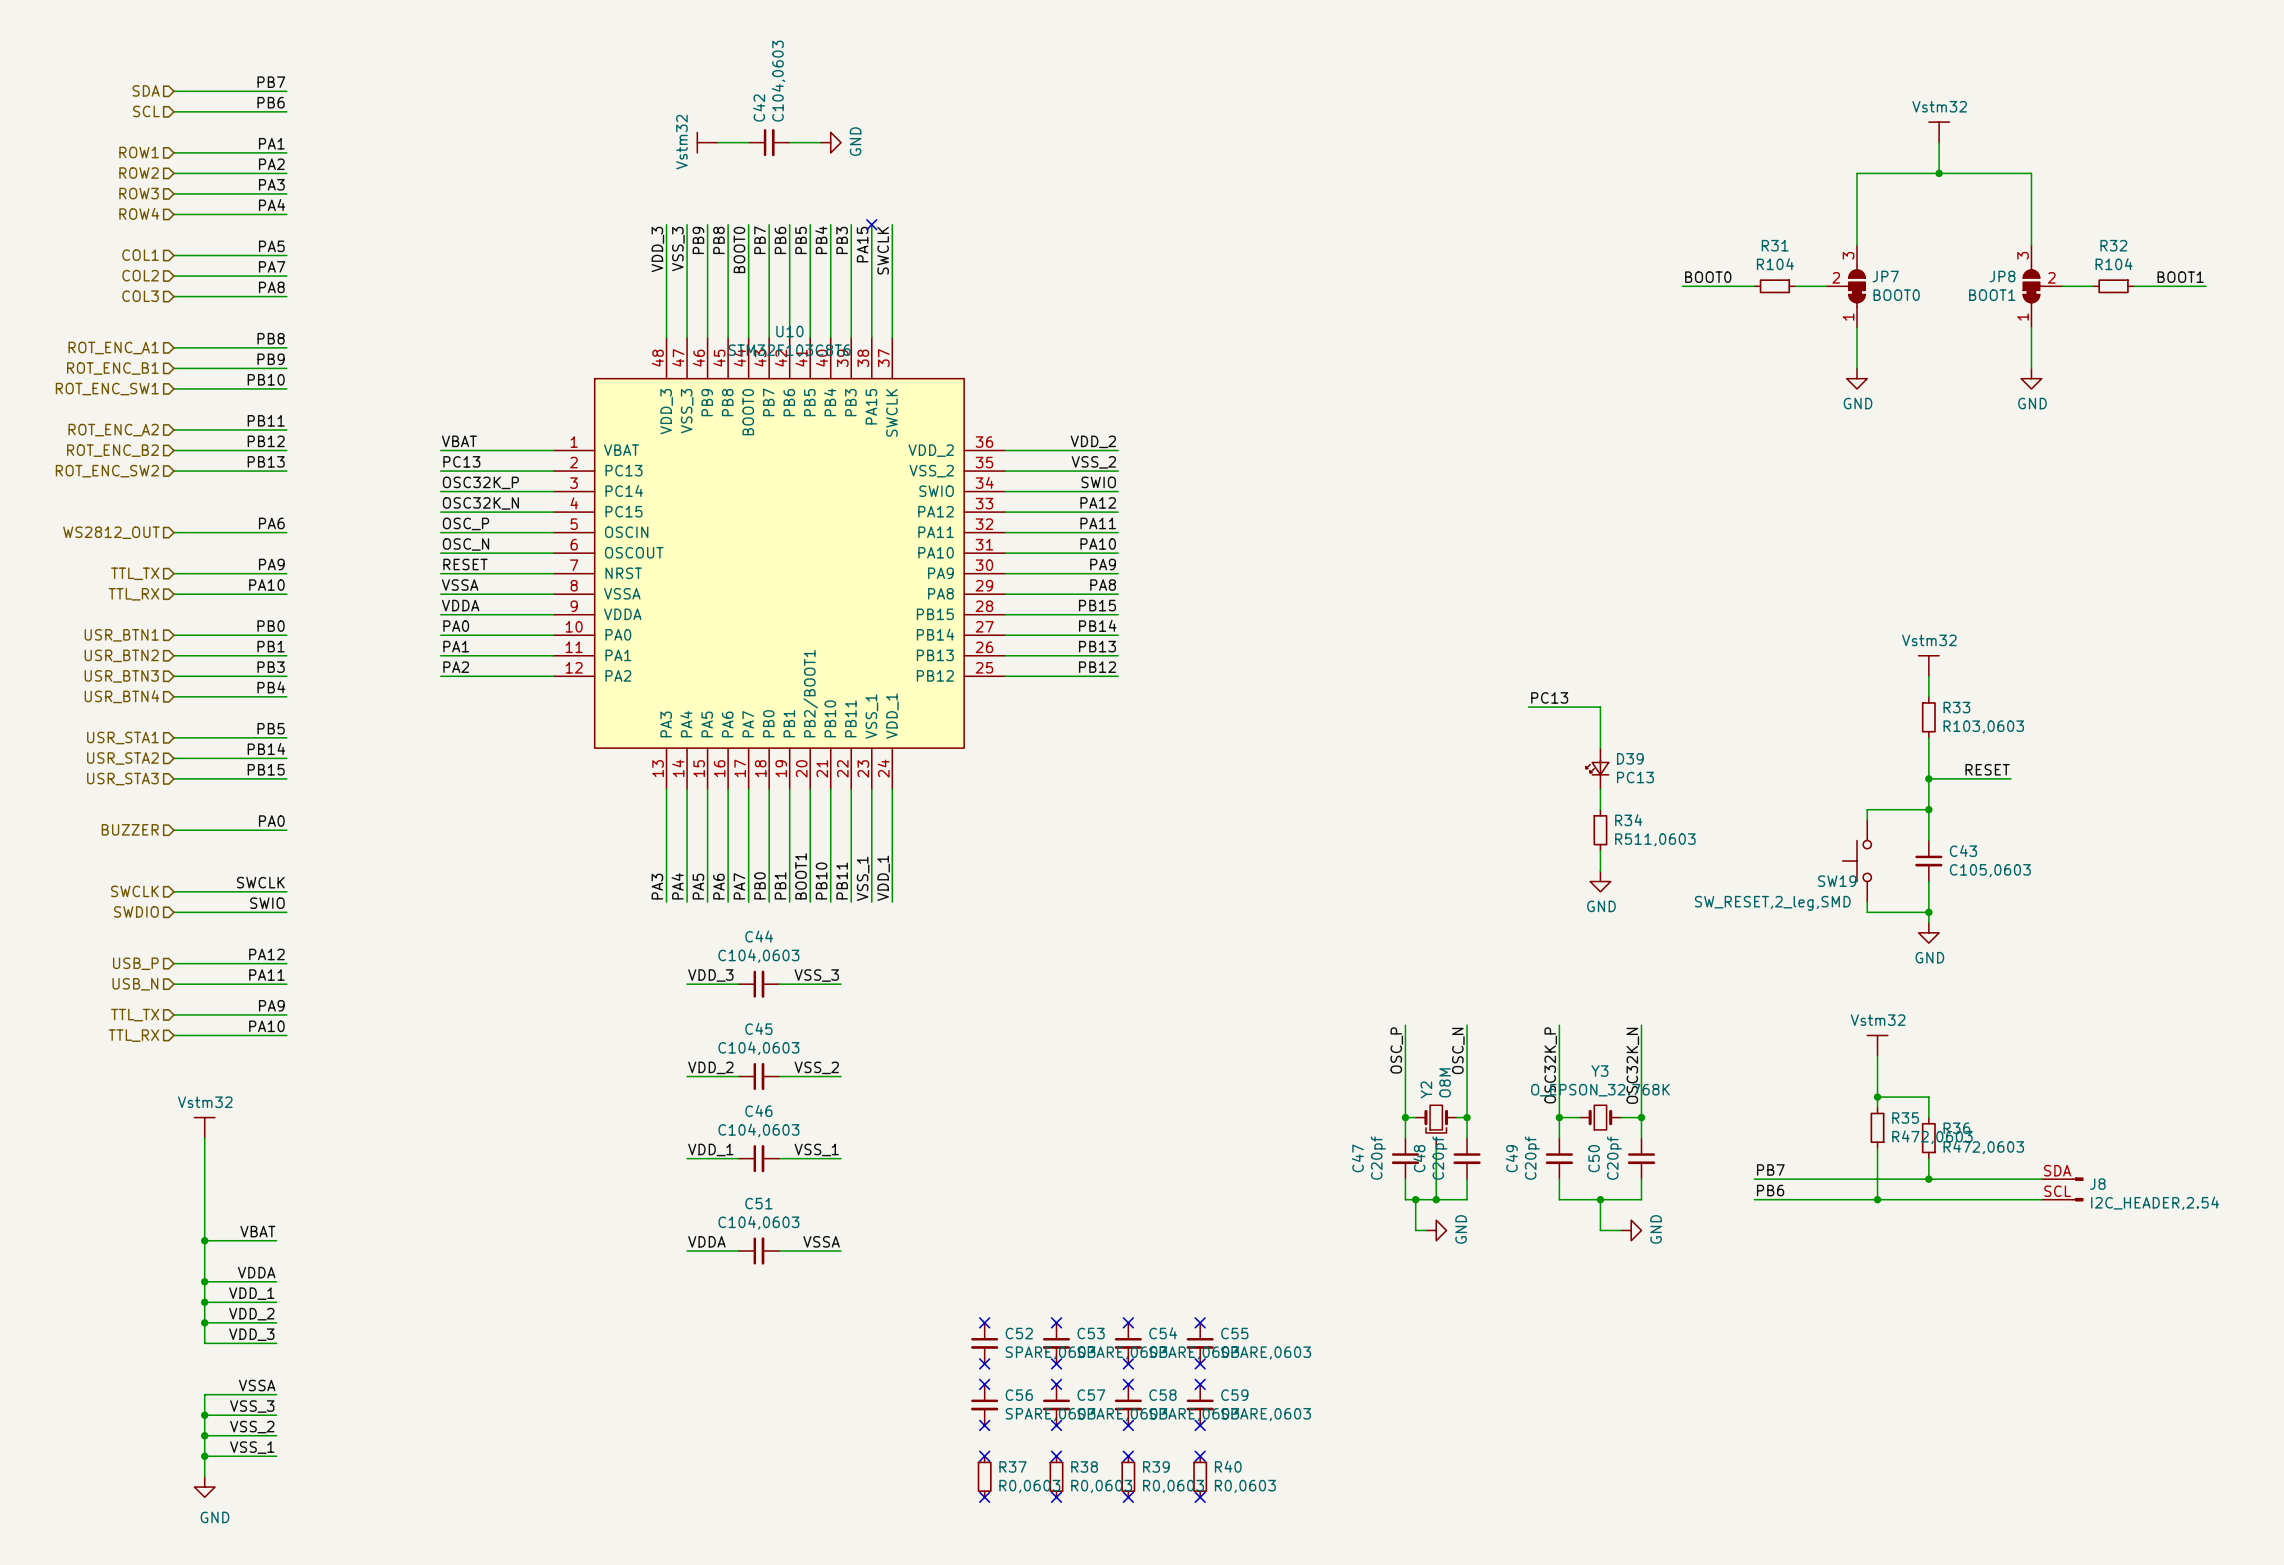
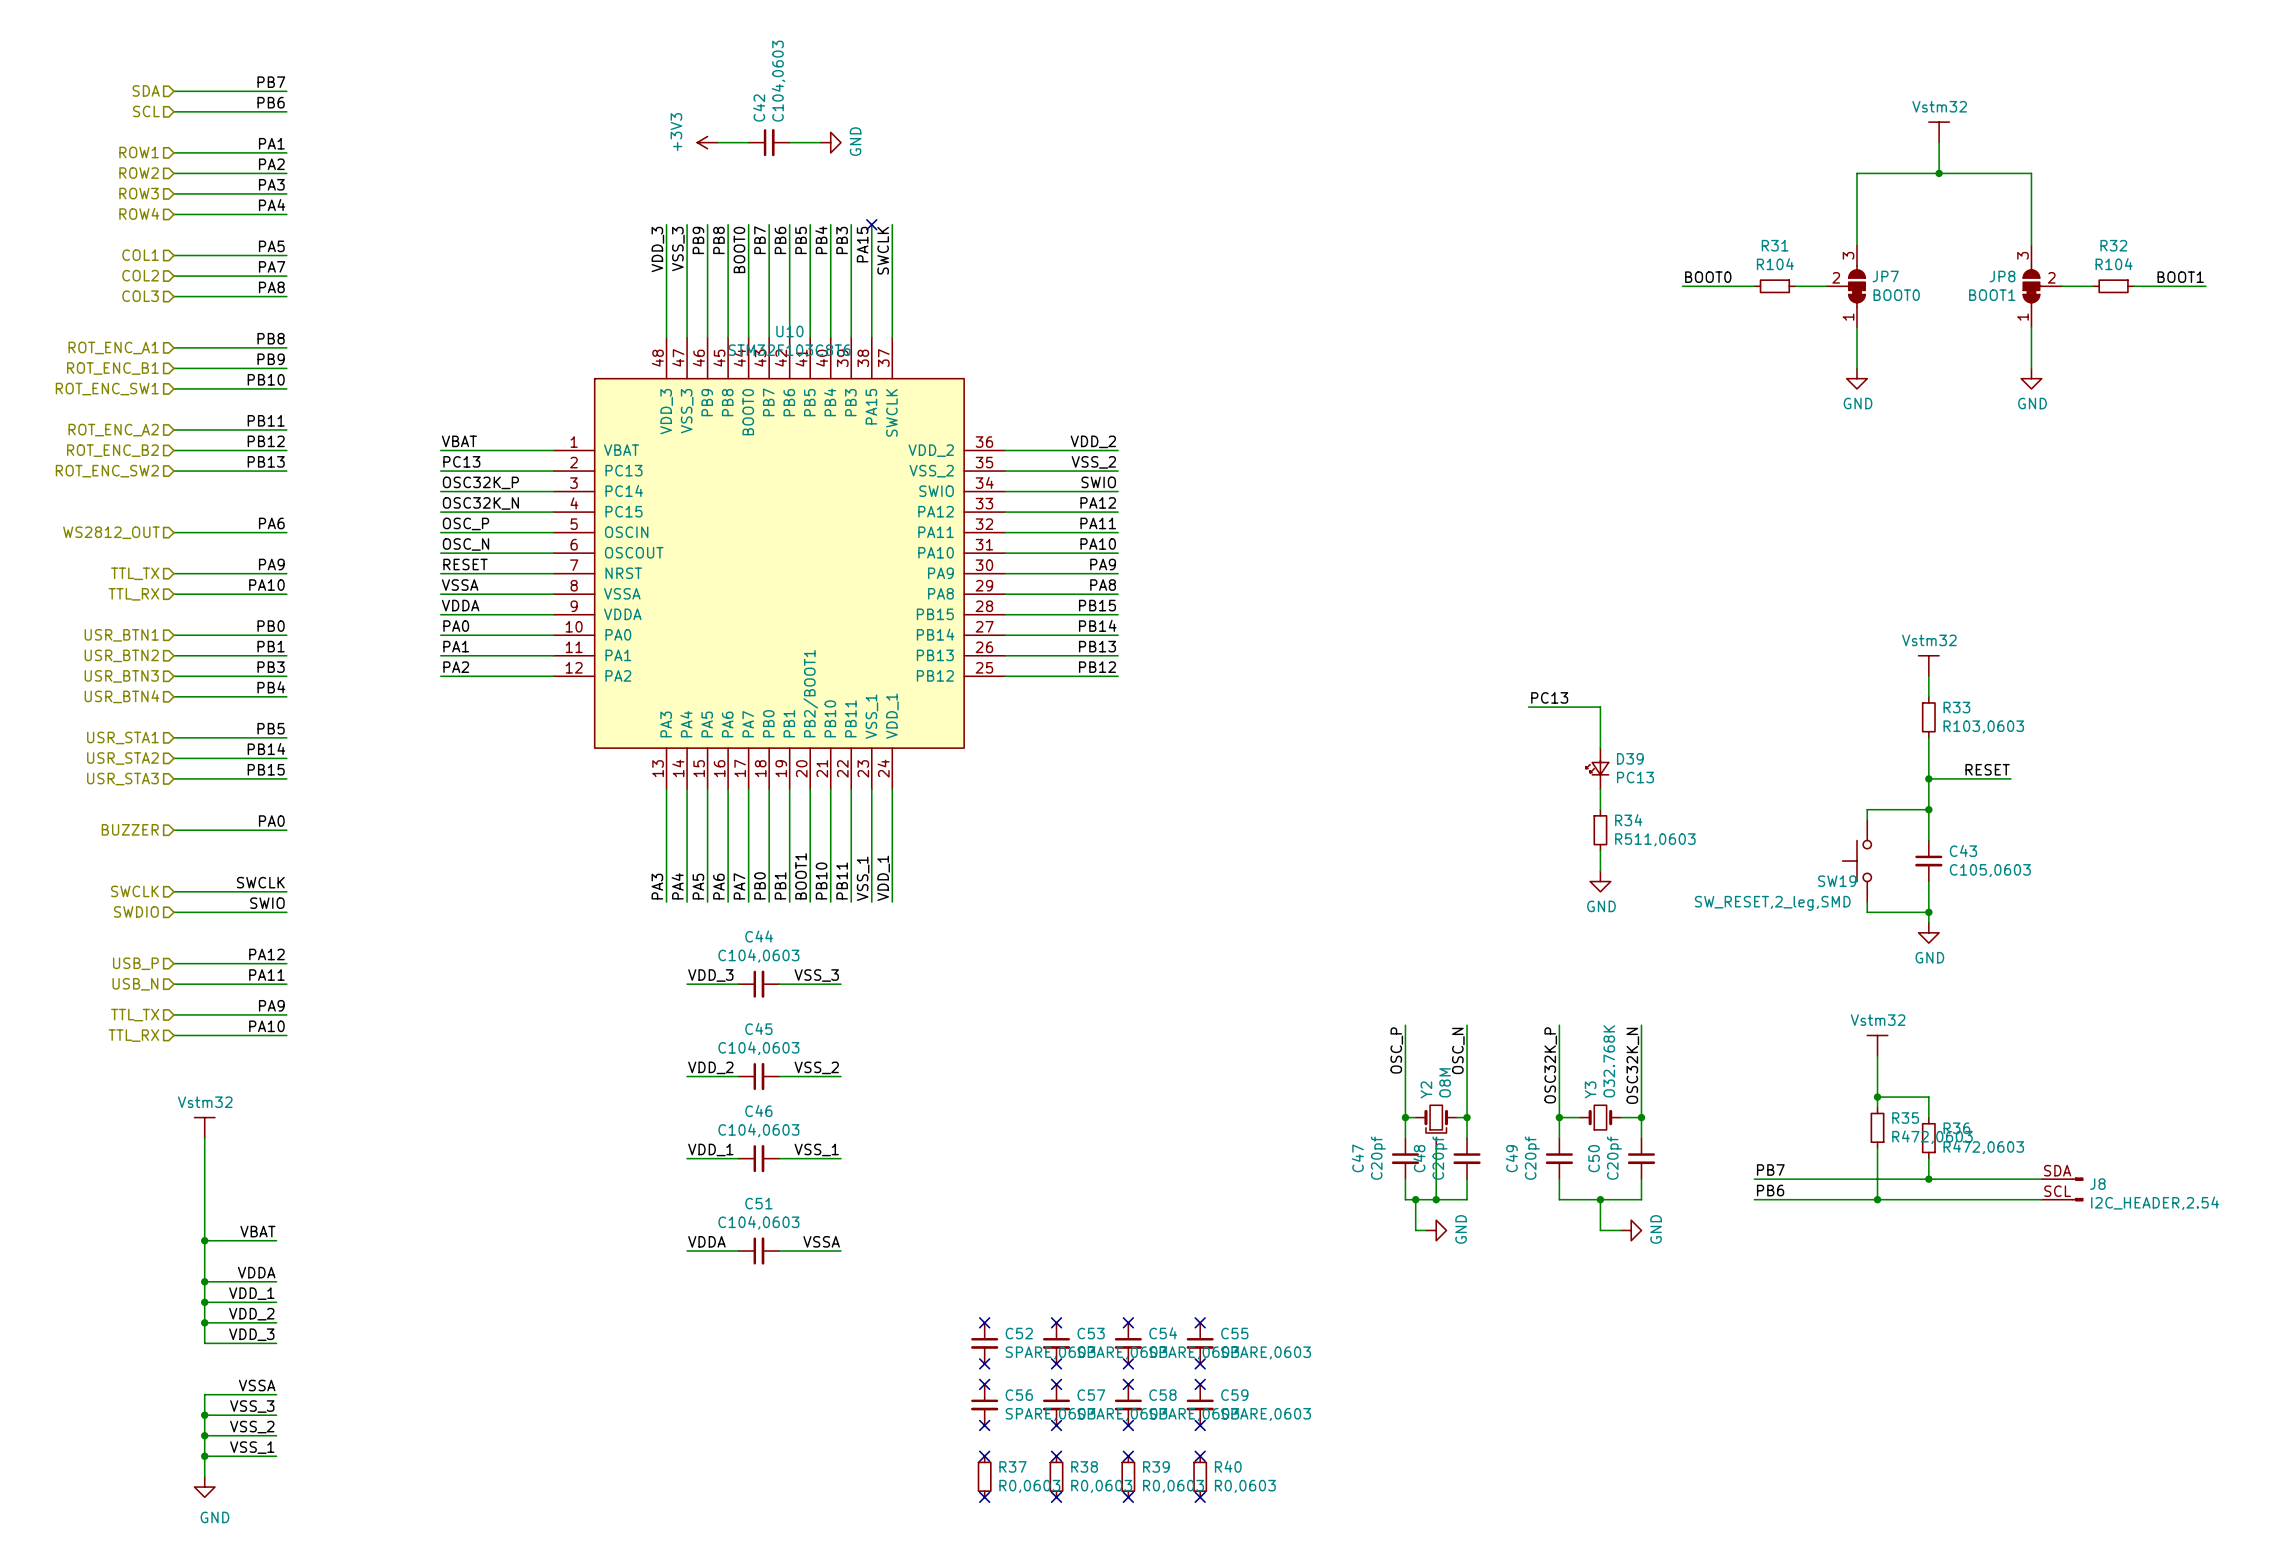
power symbol: Vstm32 (707, 142) -> +3V3 (707, 142)
Y3 name rotation: 0° (1599, 1071) -> 90° counterclockwise (1590, 1089)
Y3 value: O_EPSON_32.768K (1600, 1090) -> O32.768K (1609, 1061)

